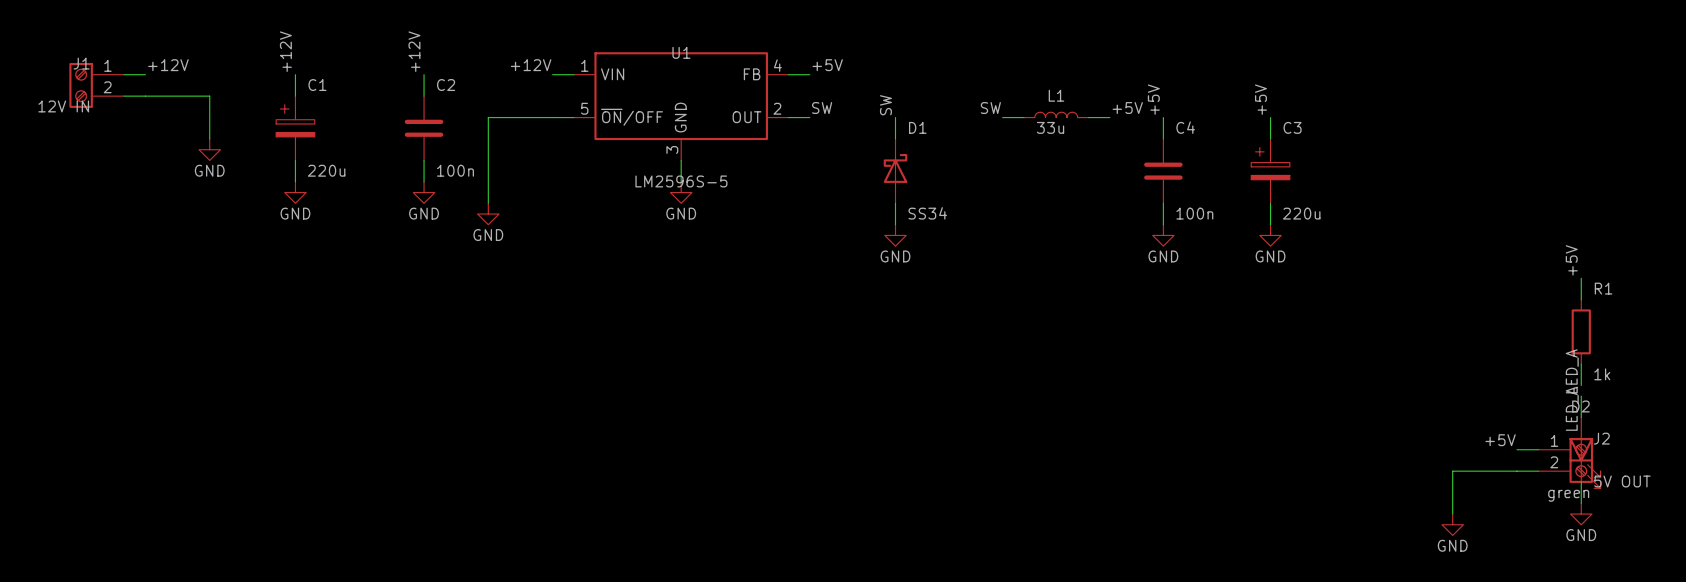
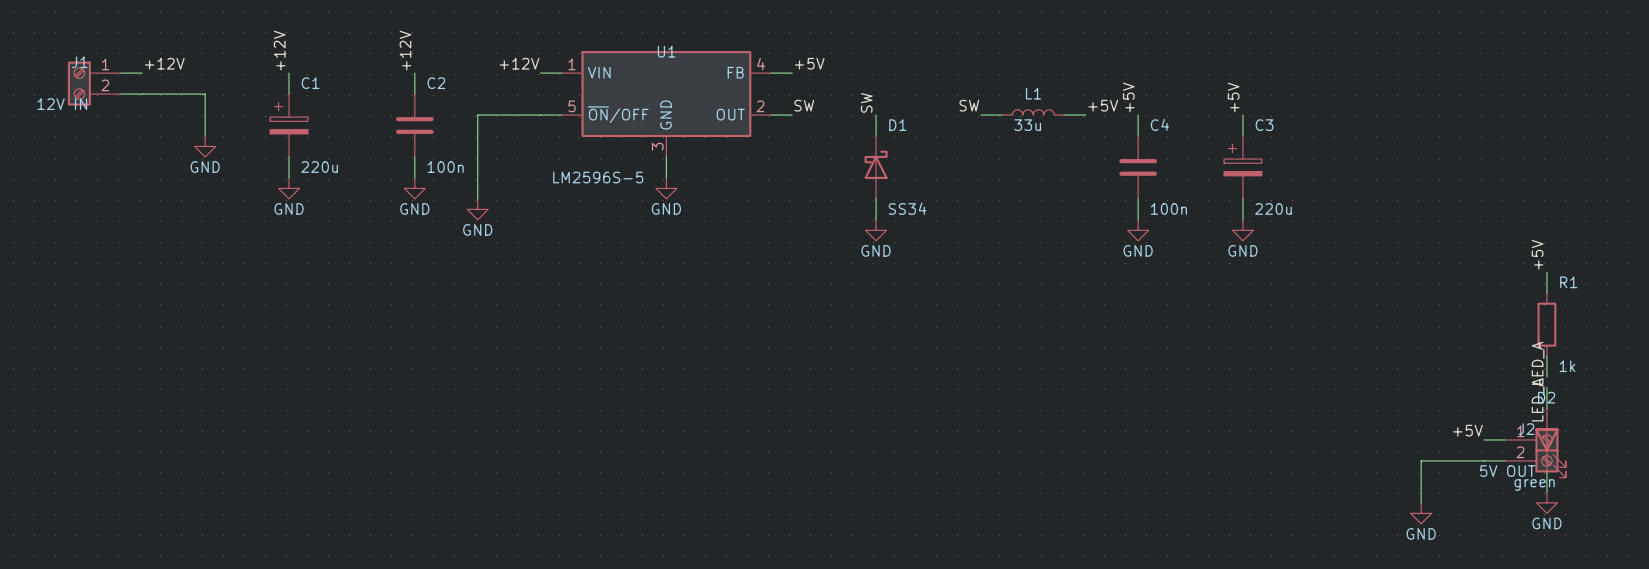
U1 value position: LM2596S-5 (681, 181) -> LM2596S-5 (598, 177)
J2 name position: J2 (1601, 438) -> J2 (1526, 429)
J2 value position: 5V OUT (1622, 481) -> 5V OUT (1507, 471)

